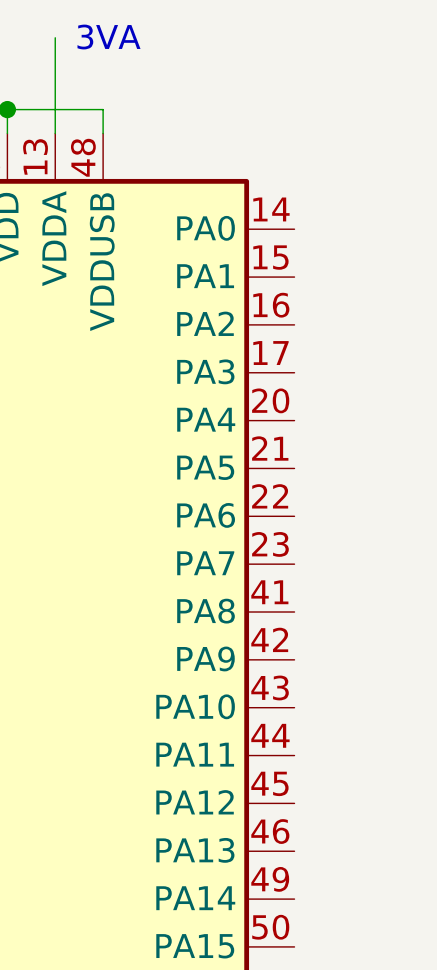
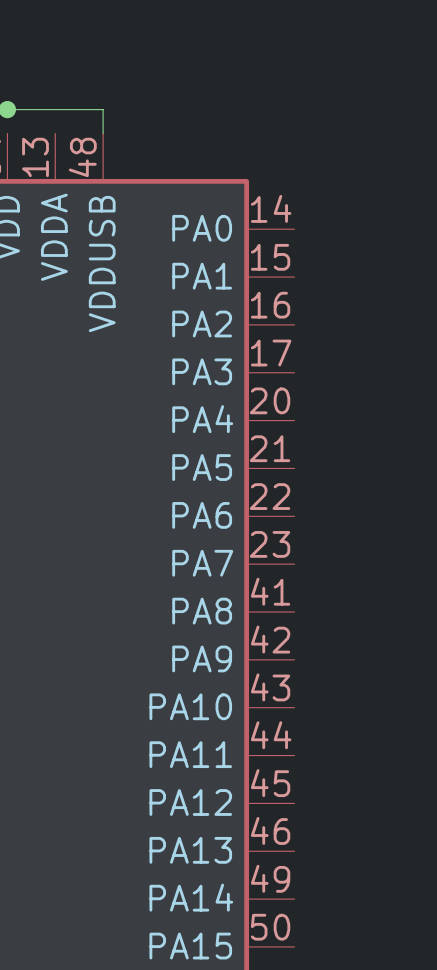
wire: (55, 37) (55, 133) -> none
text: 3VA (109, 37) -> none
wire: (7, 109) (7, 133) -> none

